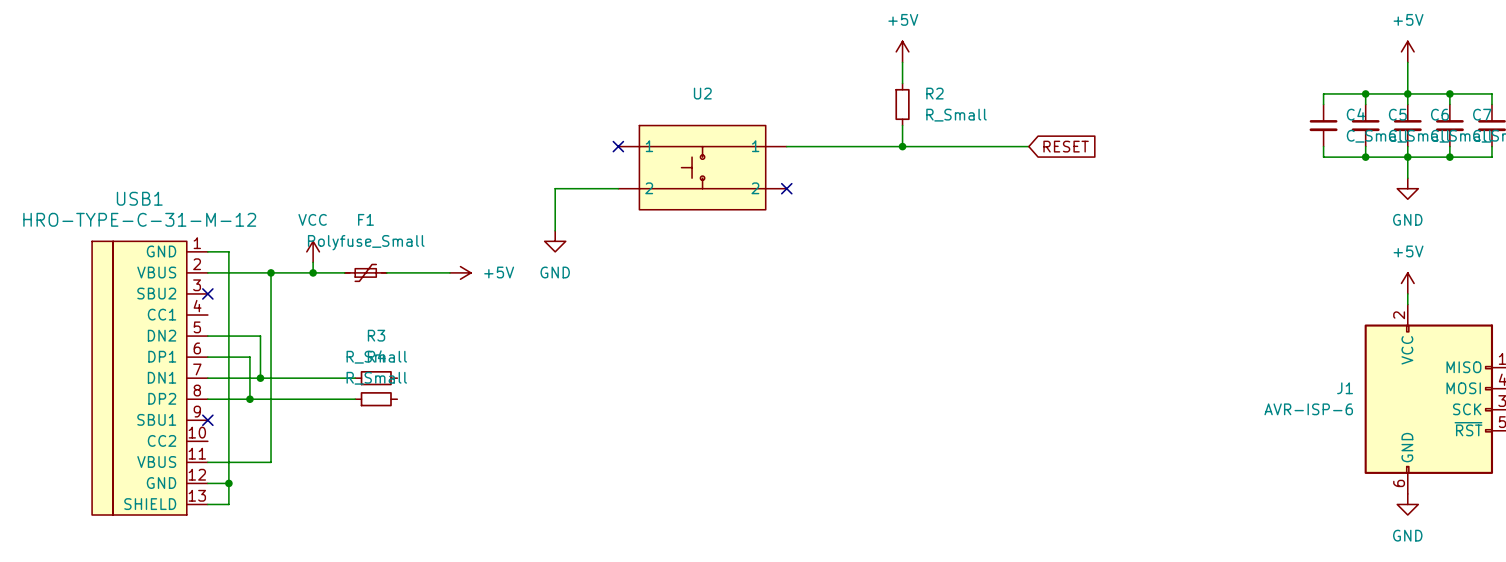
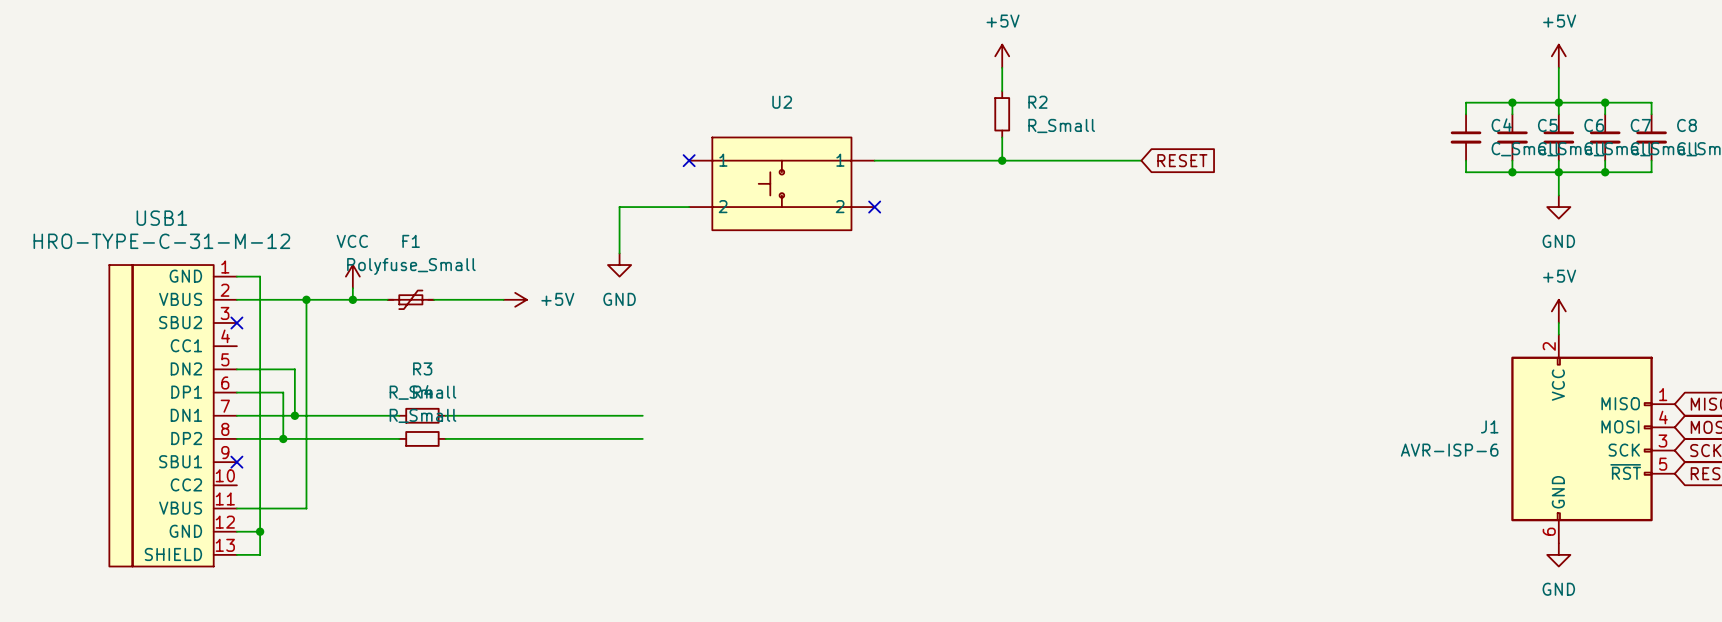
wire: none -> (445, 415) (642, 415)
wire: none -> (445, 438) (642, 438)

